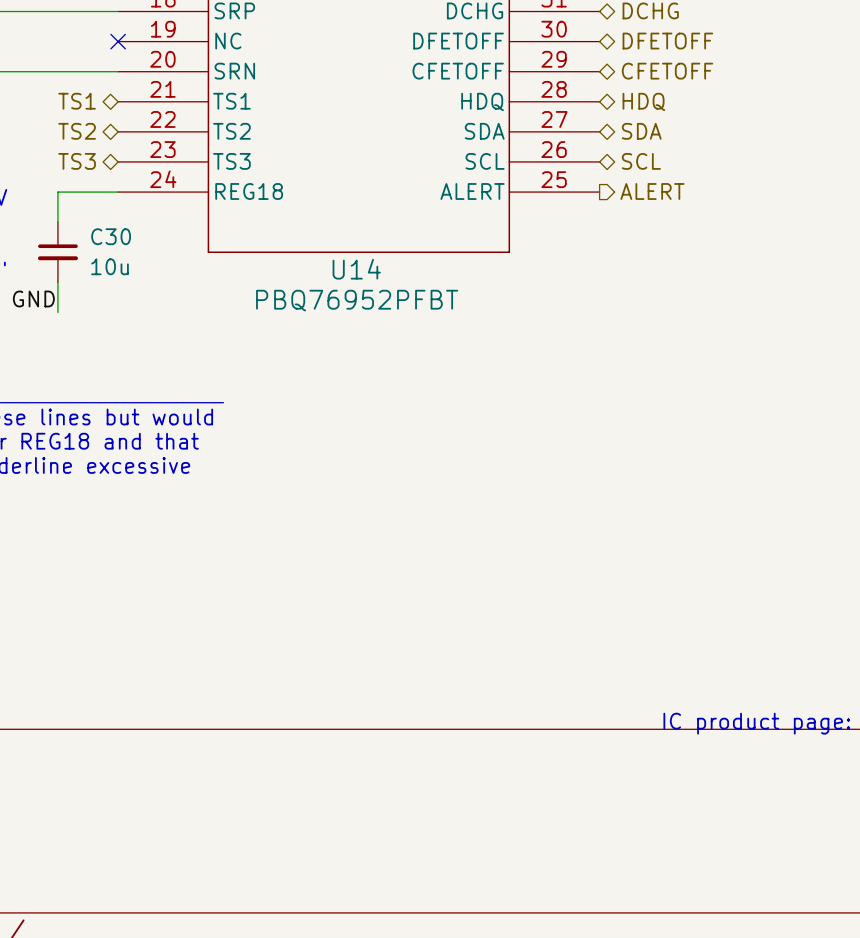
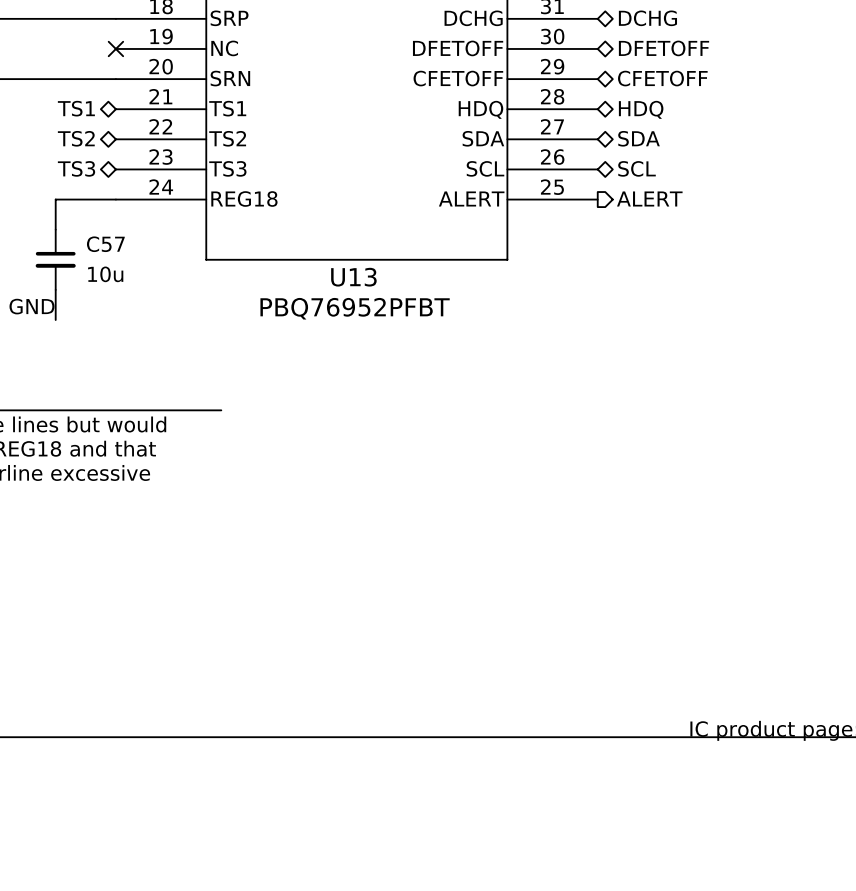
C30 name: C30 (111, 236) -> C57 (105, 244)
U14 name: U14 (356, 269) -> U13 (353, 277)

